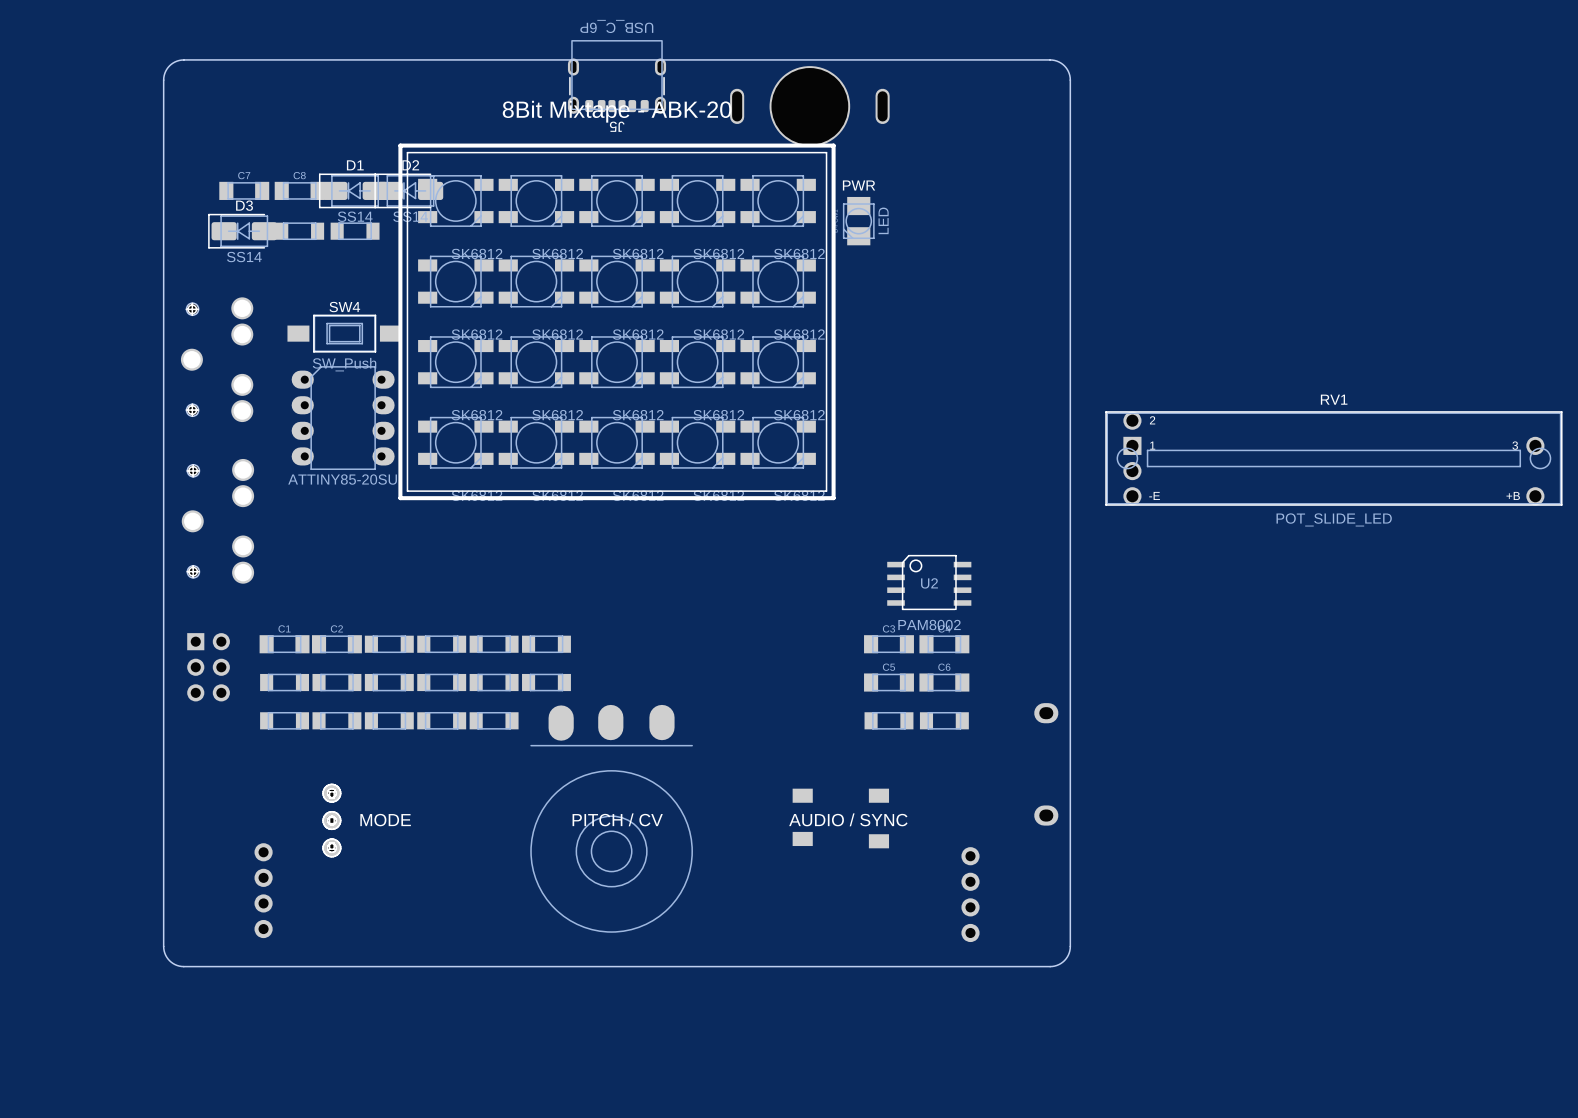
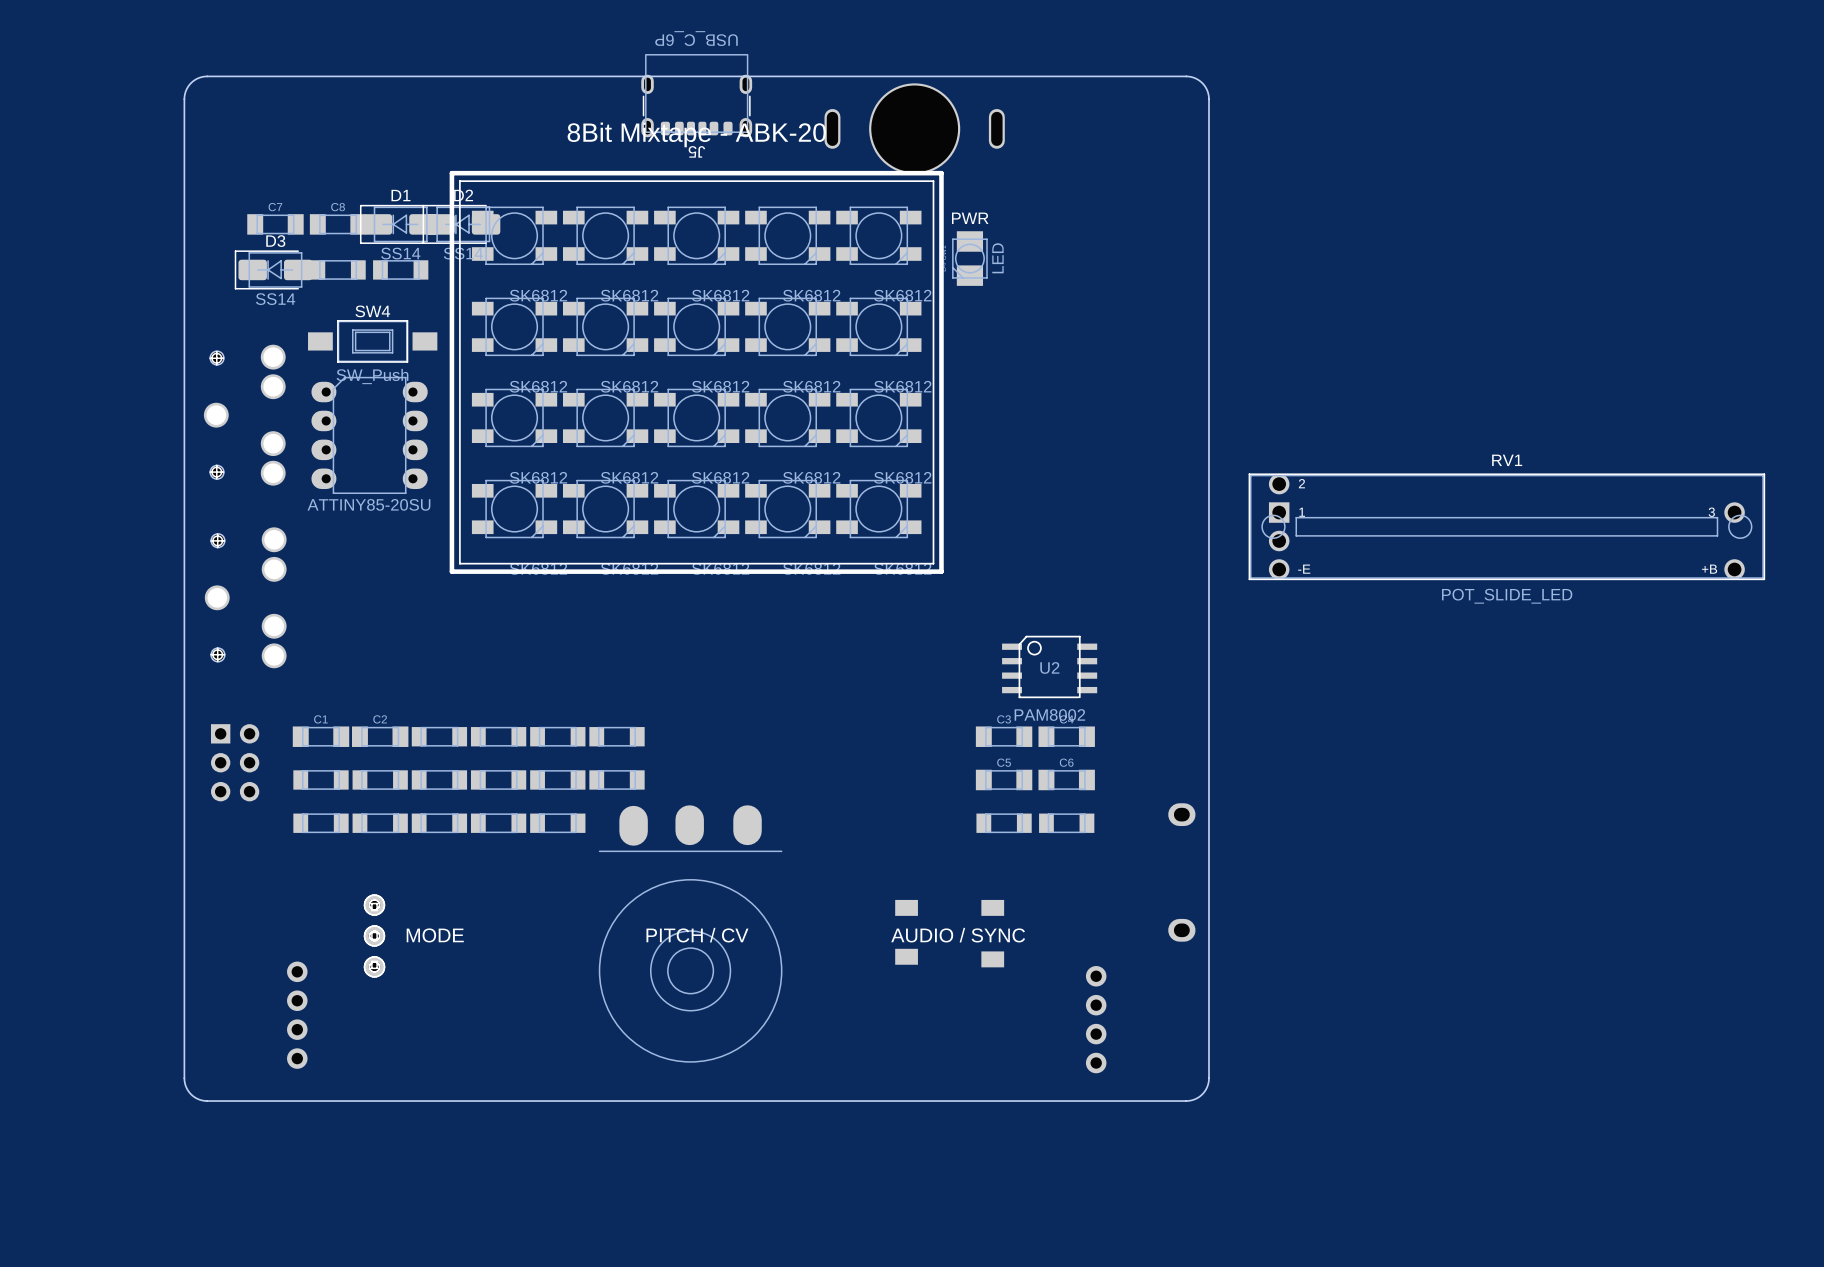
SW4 position: (344, 333) -> (372, 341)
part position: (343, 418) -> (369, 435)

